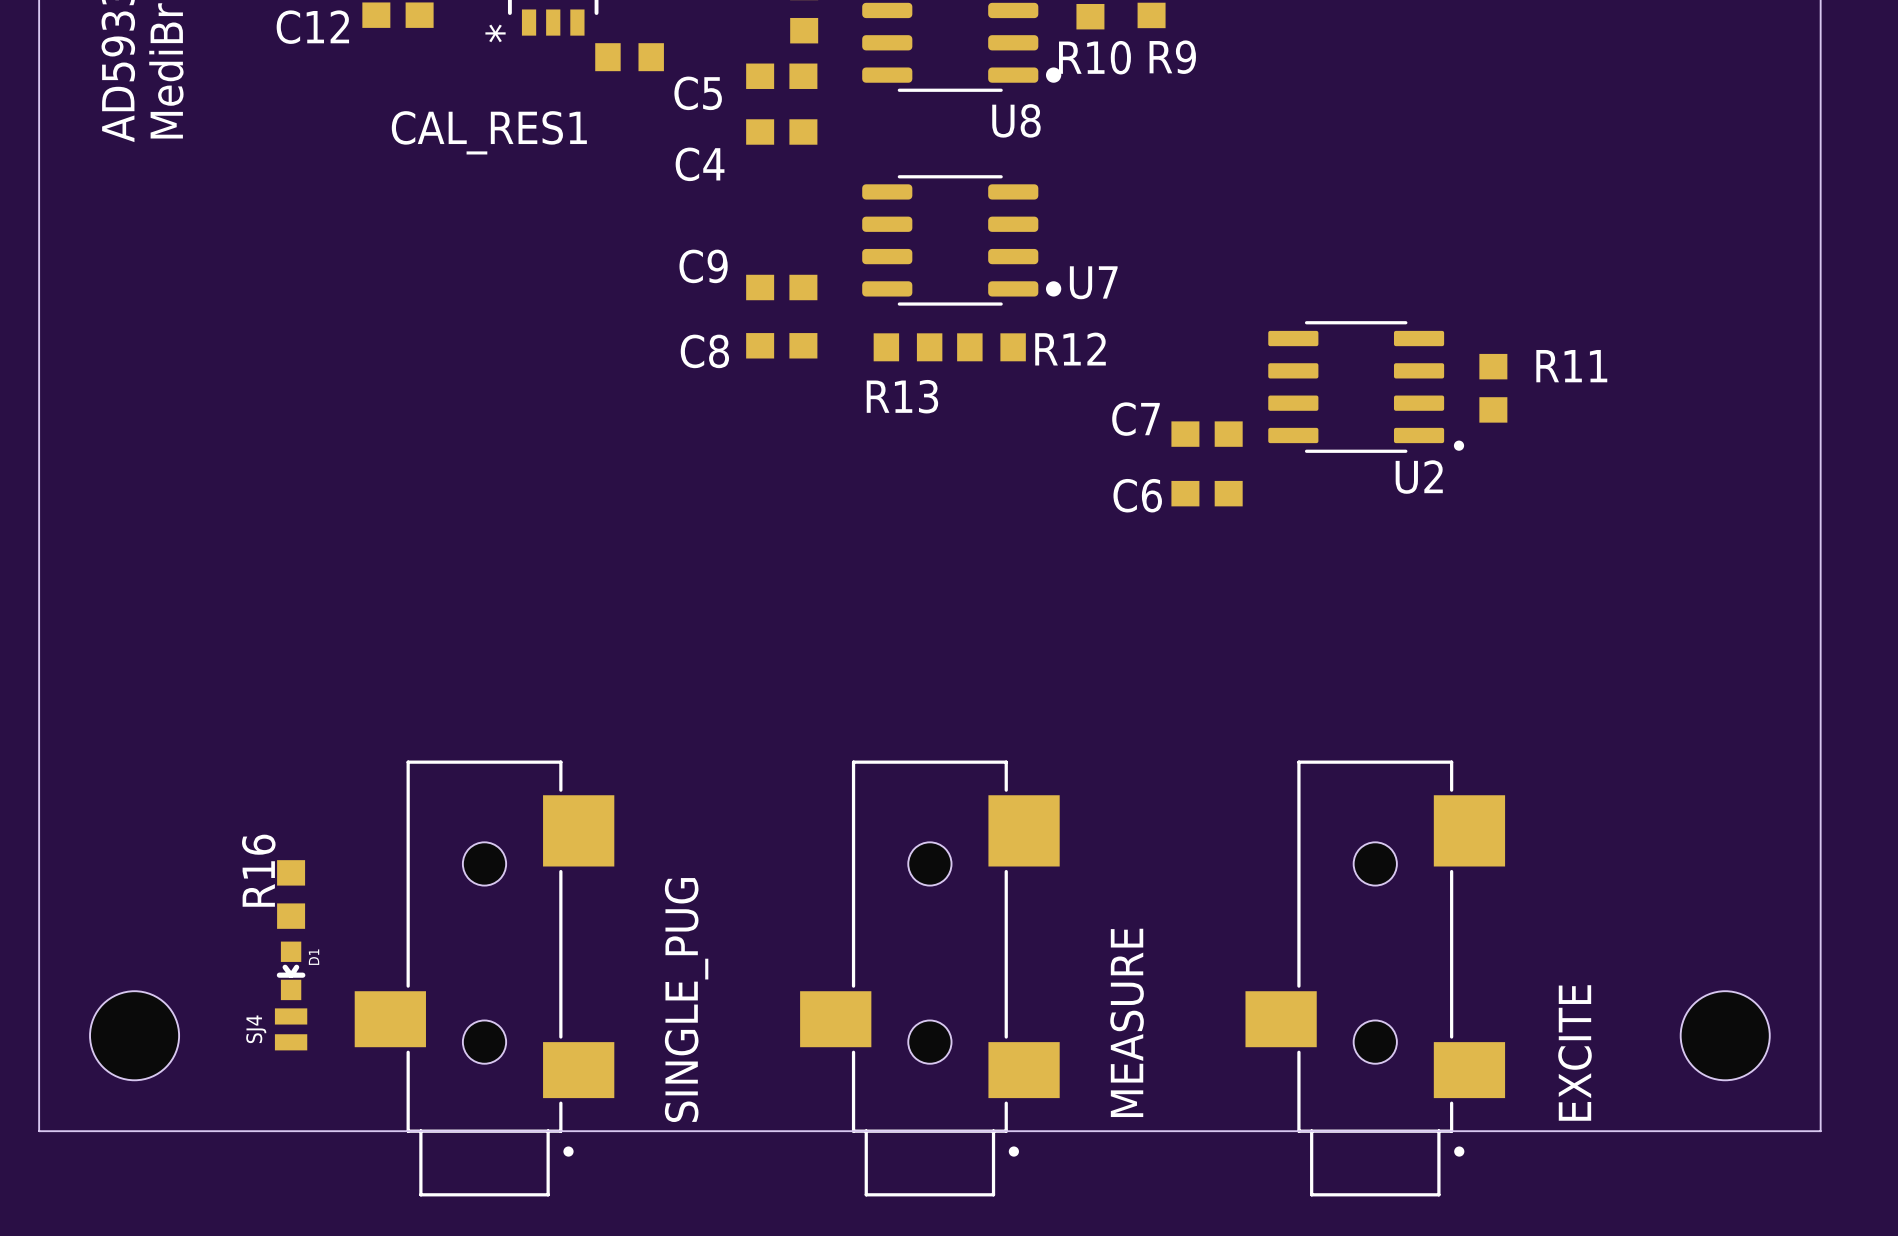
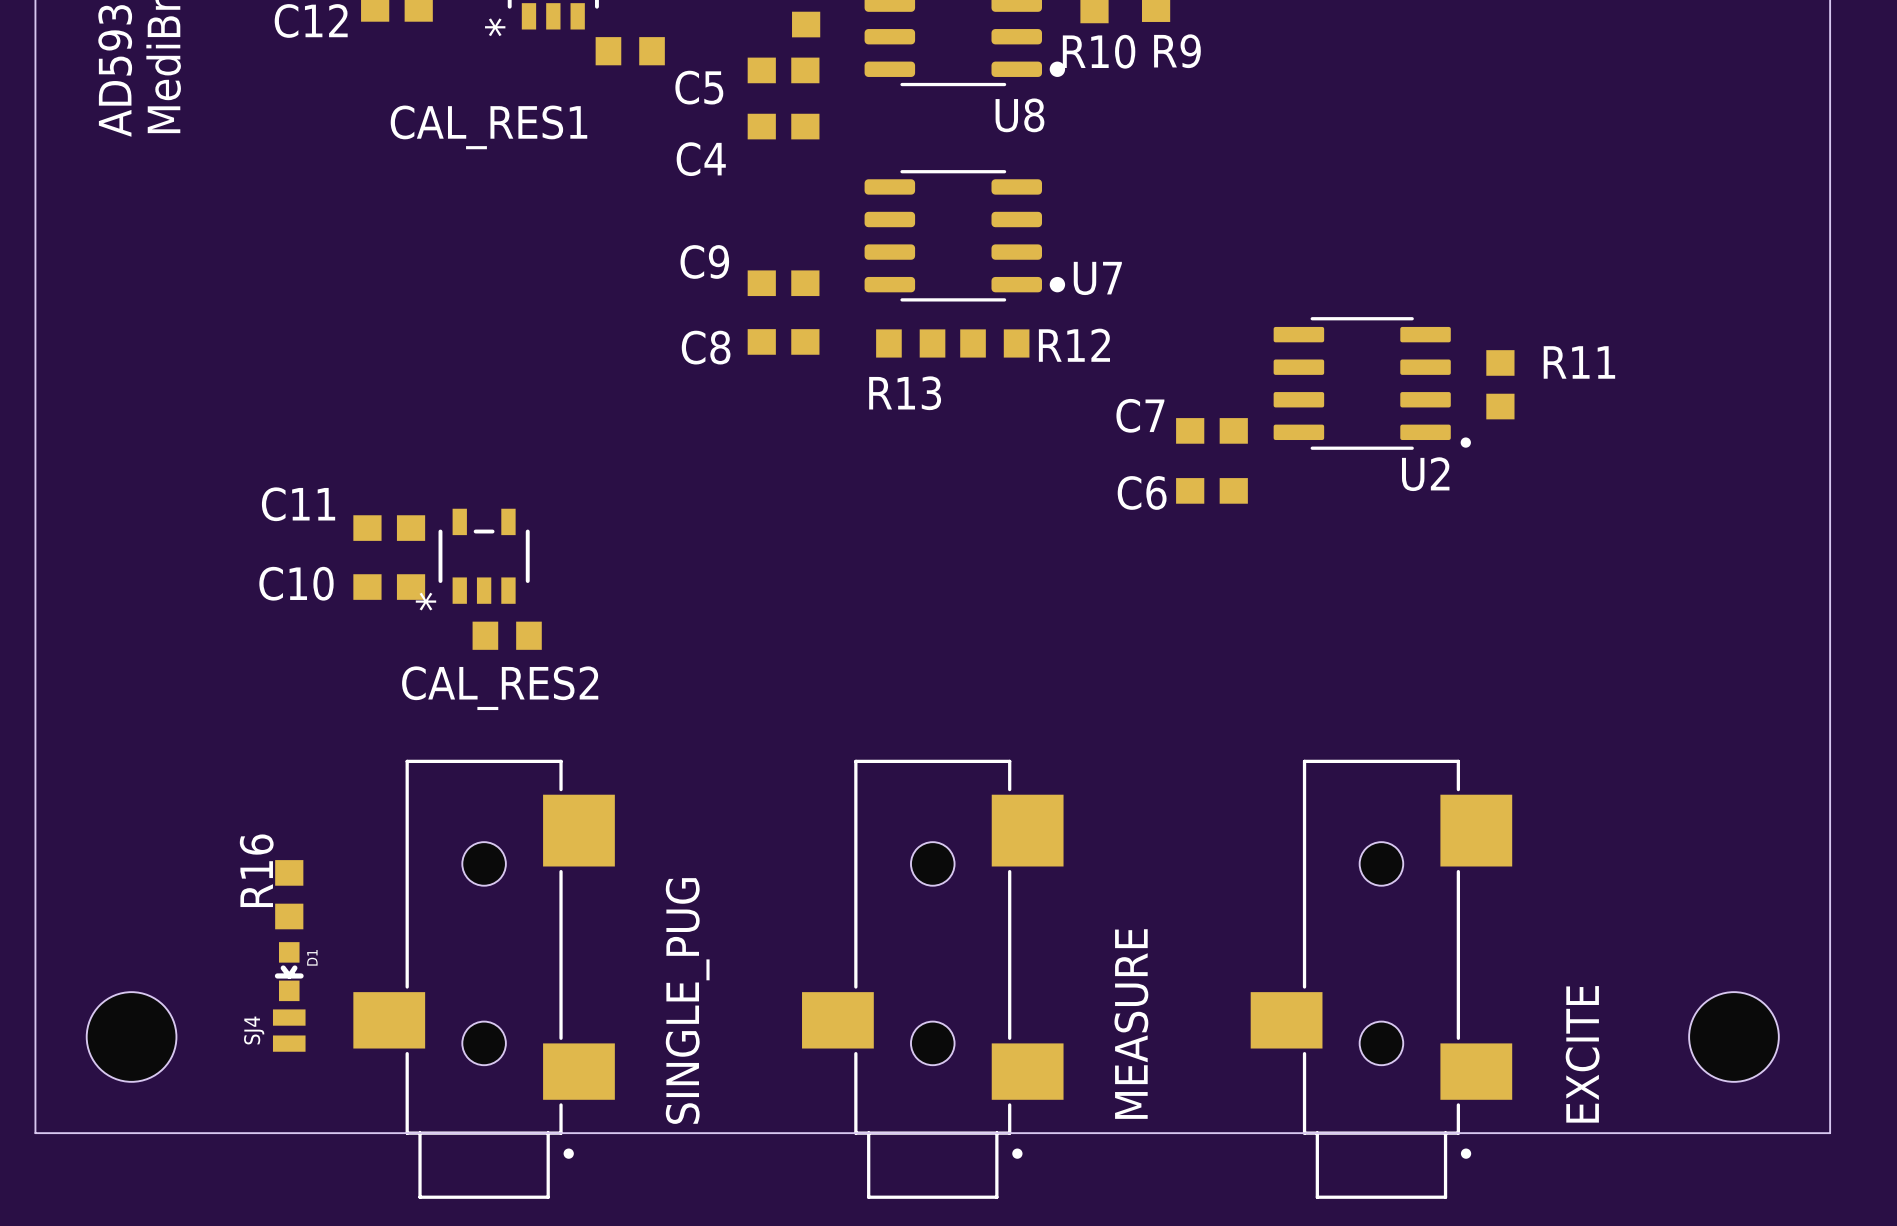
C11: none -> (389, 528)
part: none -> (484, 556)
C10: none -> (389, 587)
CAL_RES2: none -> (507, 635)

